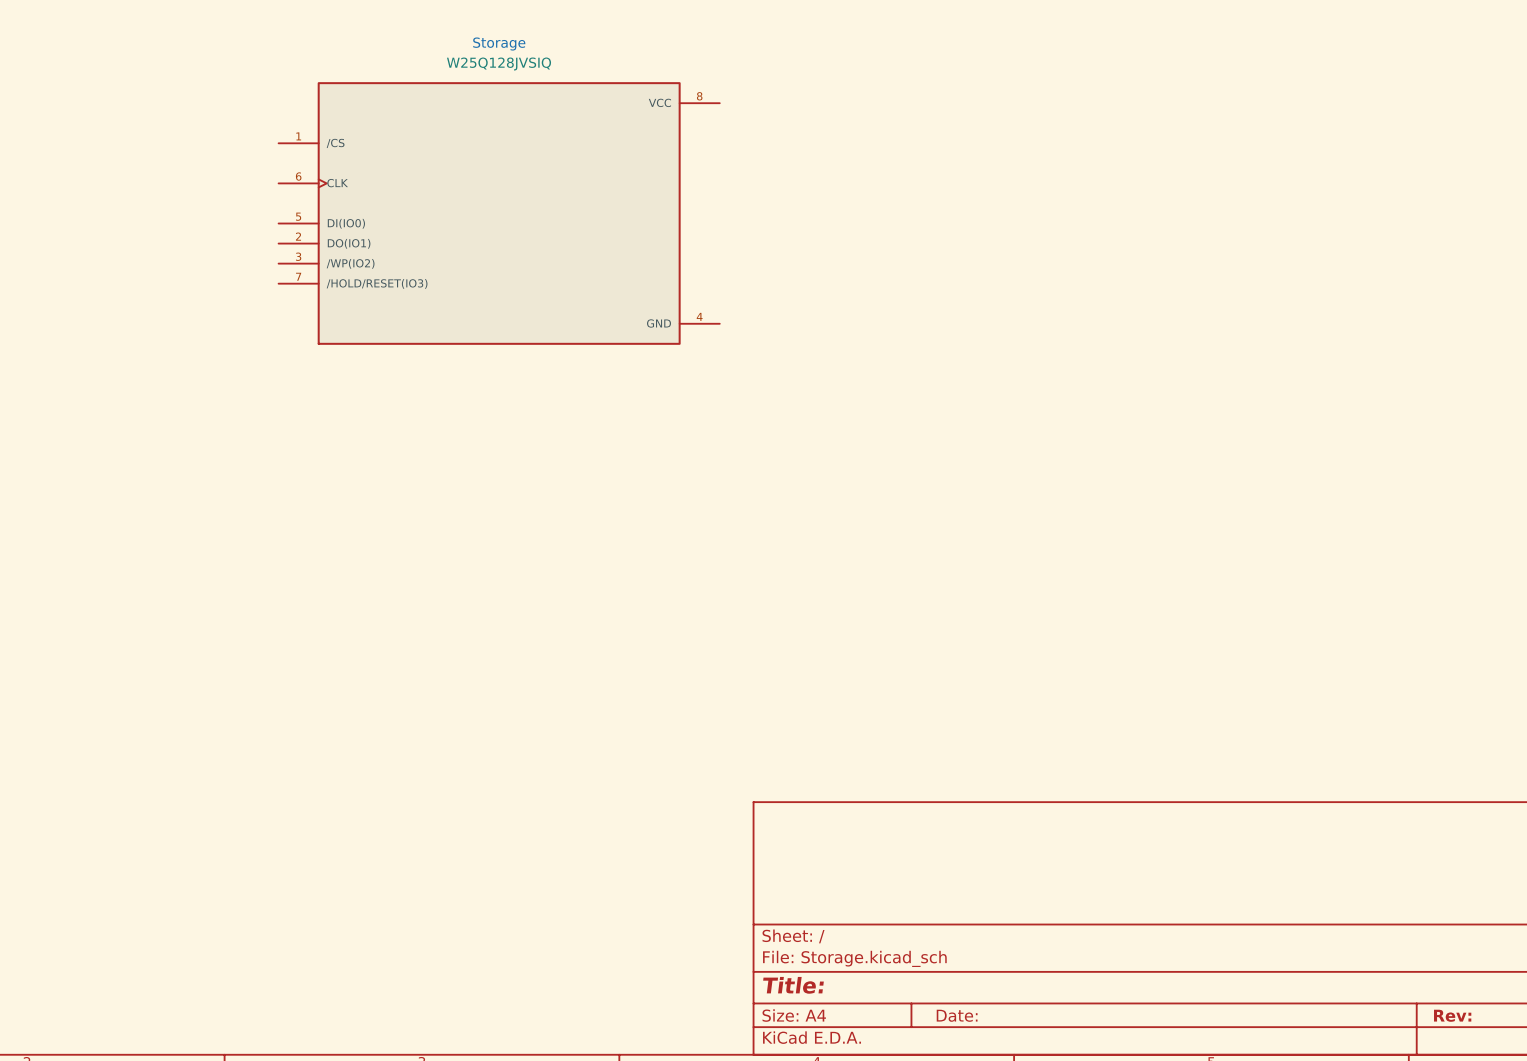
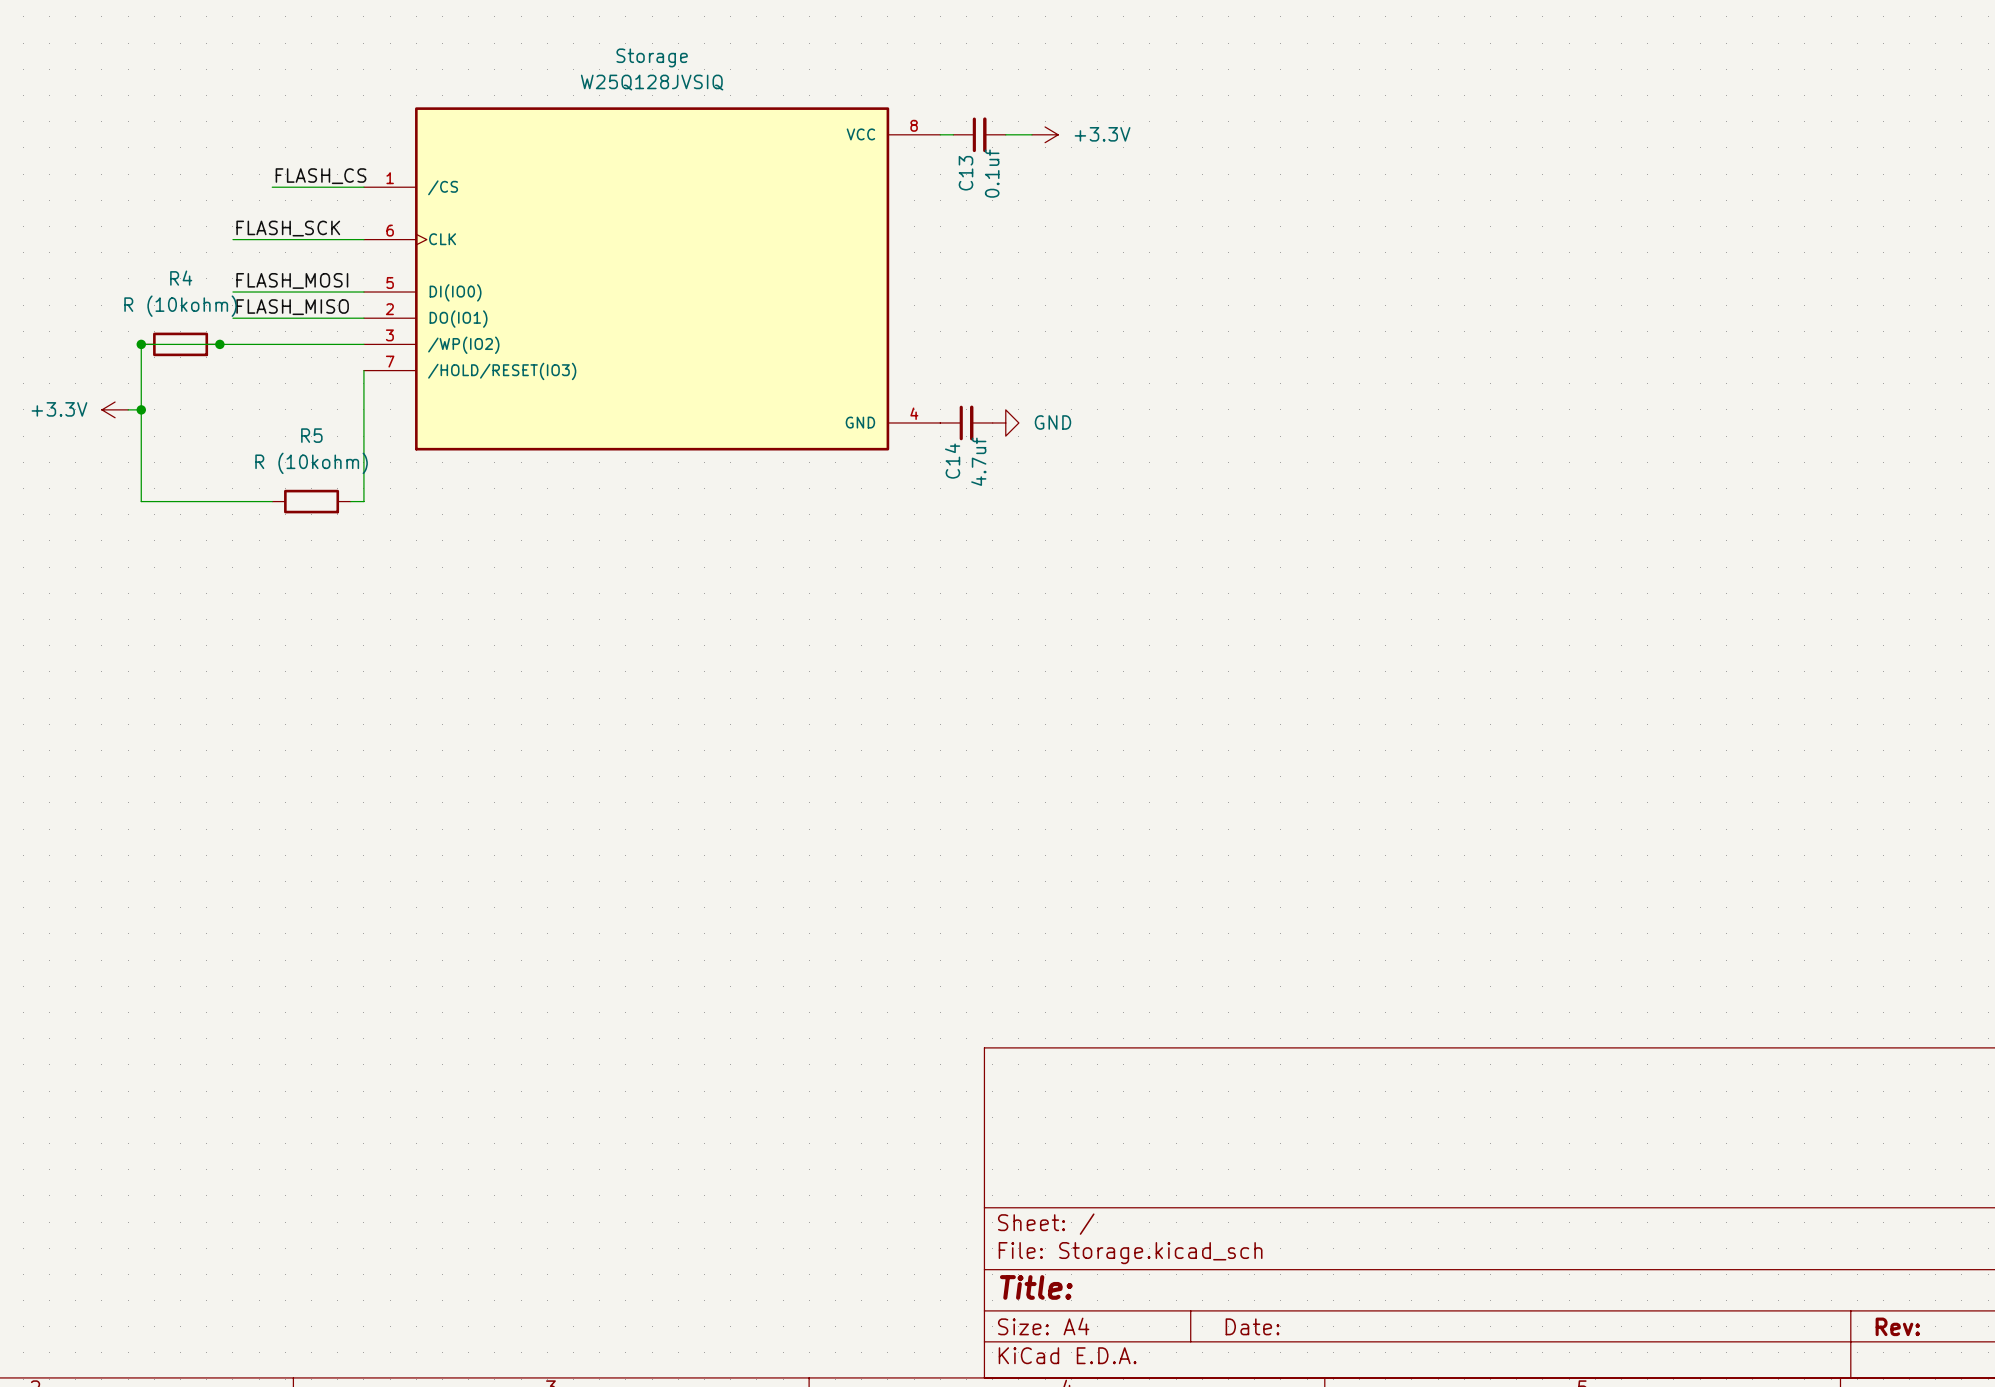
wire: none -> (940, 134) (953, 134)
C13: none -> 0.1uf (979, 134)
wire: none -> (1005, 134) (1031, 134)
power symbol: none -> +3.3V (1045, 134)
label: none -> FLASH_CS (321, 176)
wire: none -> (272, 187) (363, 187)
label: none -> FLASH_SCK (288, 228)
wire: none -> (232, 239) (363, 239)
label: none -> FLASH_MOSI (292, 280)
wire: none -> (232, 292) (363, 292)
label: none -> FLASH_MISO (292, 307)
wire: none -> (232, 318) (363, 318)
junction: none -> (141, 344)
R4: none -> R (10kohm) (180, 344)
junction: none -> (219, 344)
wire: none -> (363, 344) (141, 344) (141, 501) (272, 501)
wire: none -> (363, 370) (363, 501) (350, 501)
power symbol: none -> +3.3V (115, 409)
wire: none -> (128, 409) (141, 409)
junction: none -> (141, 409)
C14: none -> 4.7uf (966, 422)
power symbol: none -> GND (1005, 422)
R5: none -> R (10kohm) (311, 501)

